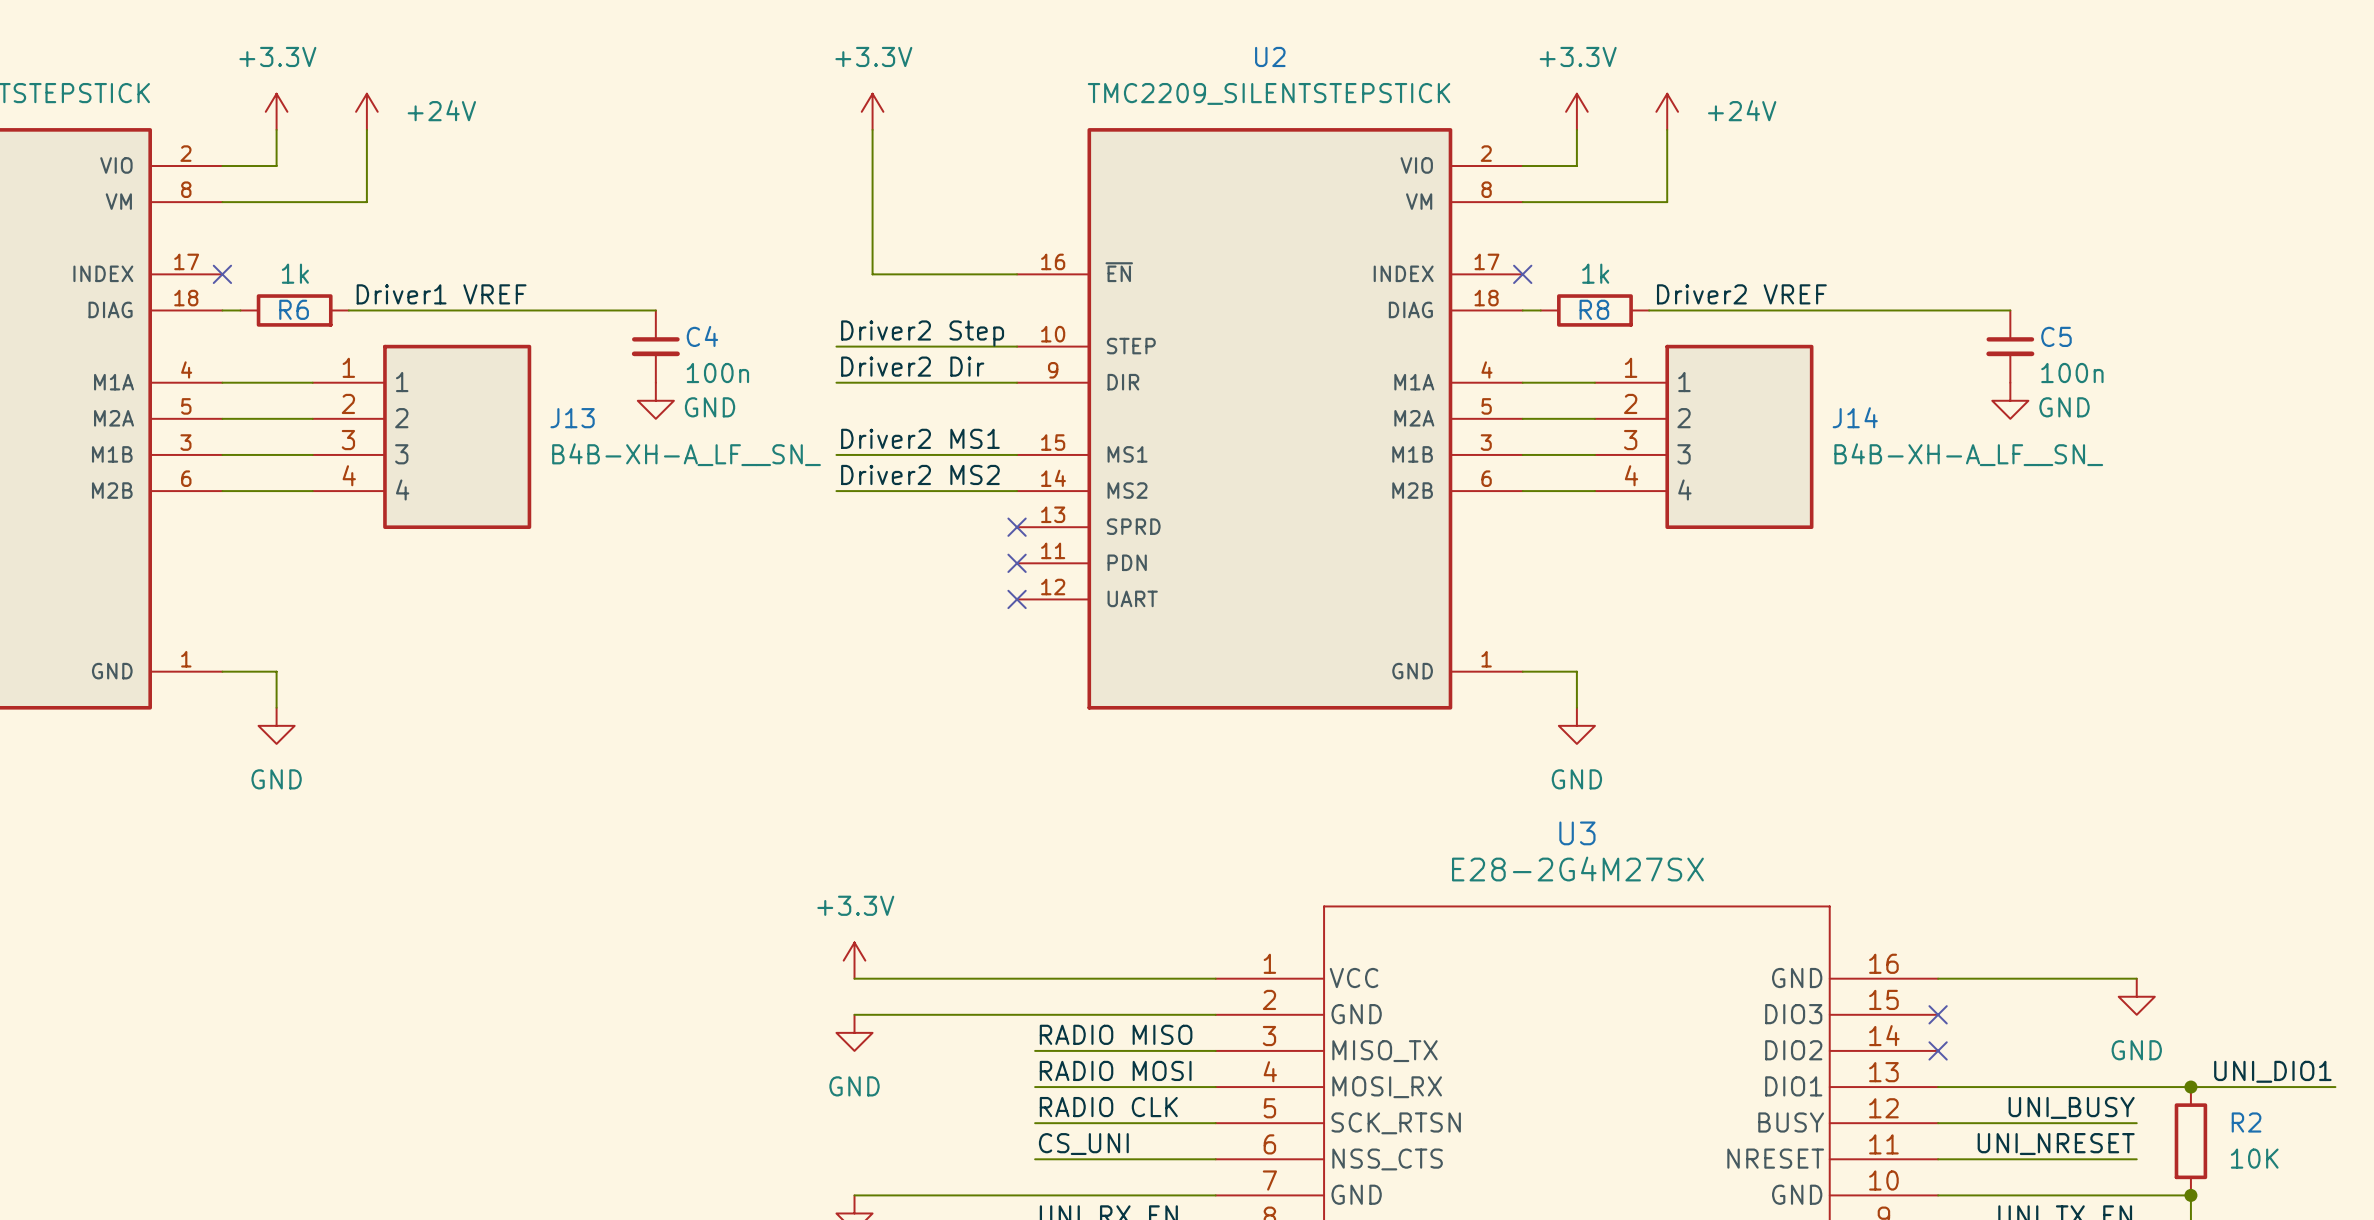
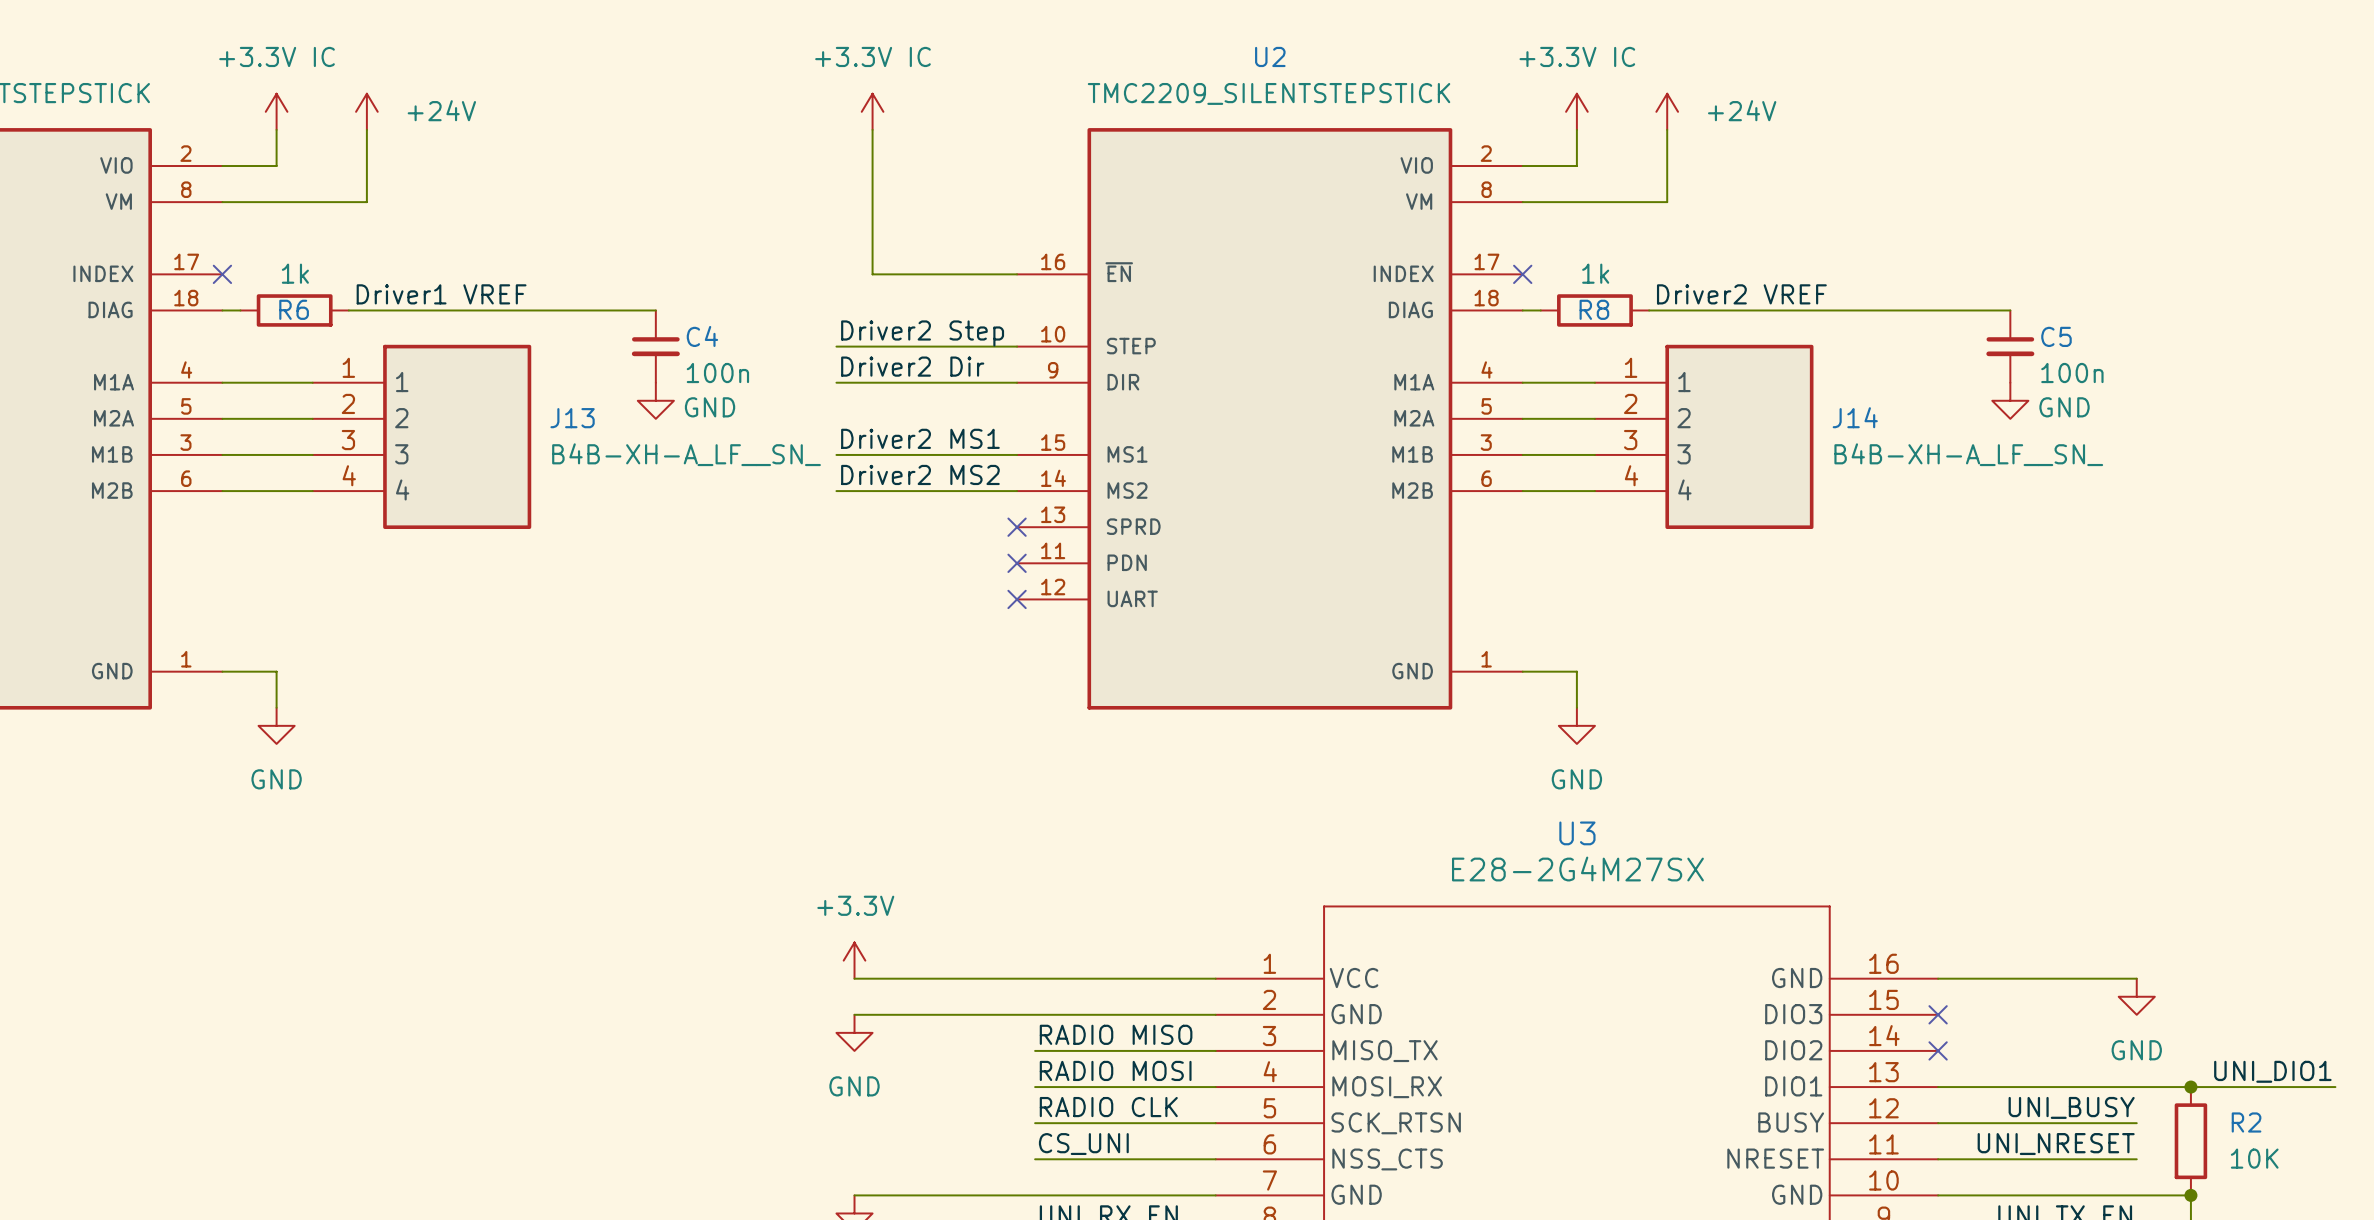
power symbol: +3.3V (276, 111) -> +3.3V IC (276, 111)
power symbol: +3.3V (872, 111) -> +3.3V IC (872, 111)
power symbol: +3.3V (1576, 111) -> +3.3V IC (1576, 111)

